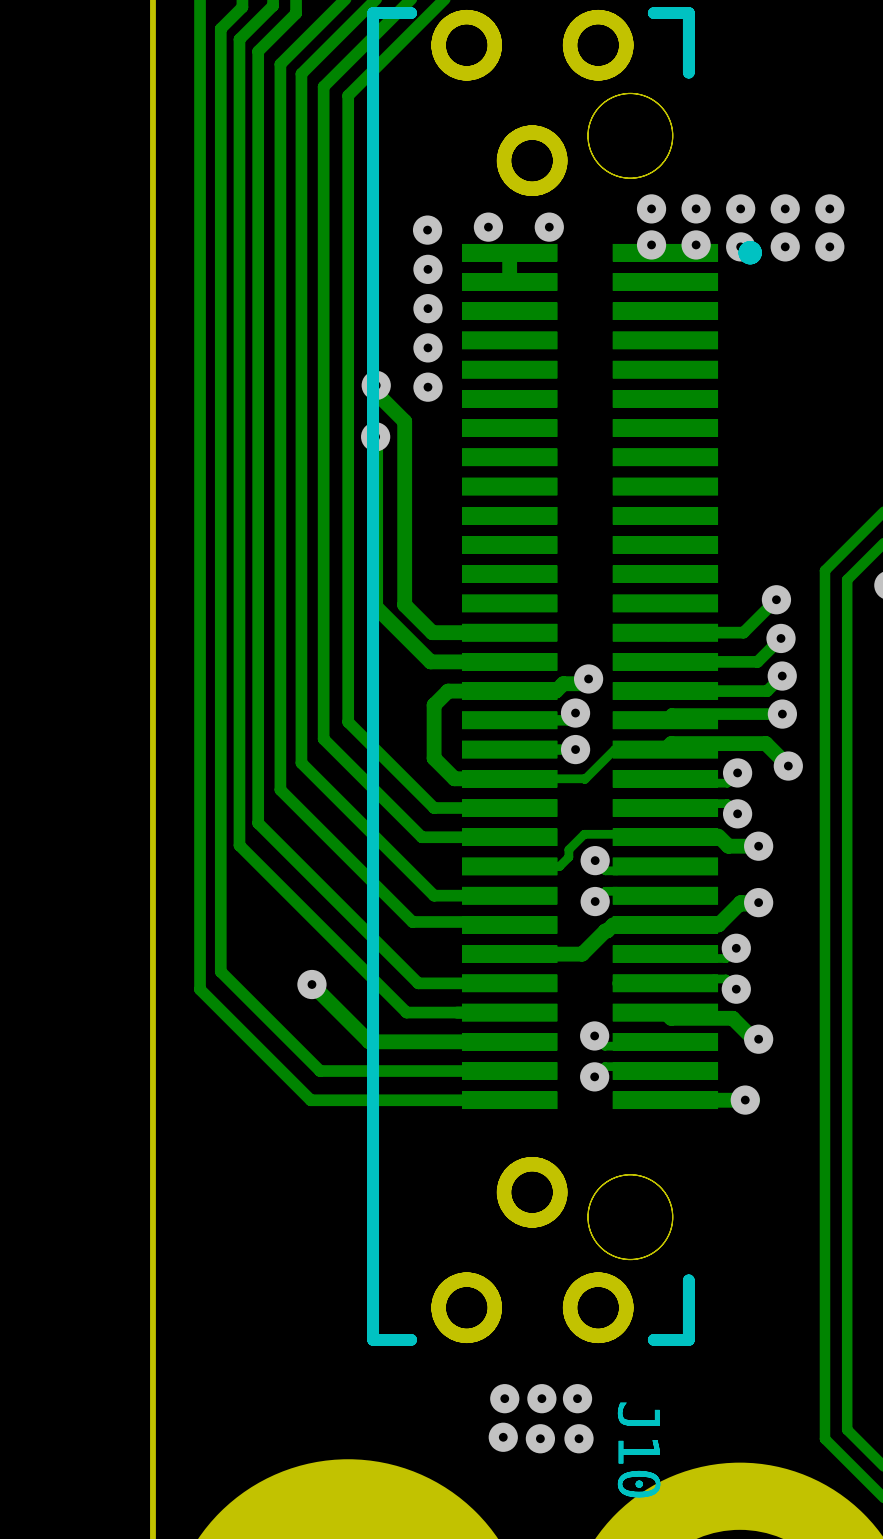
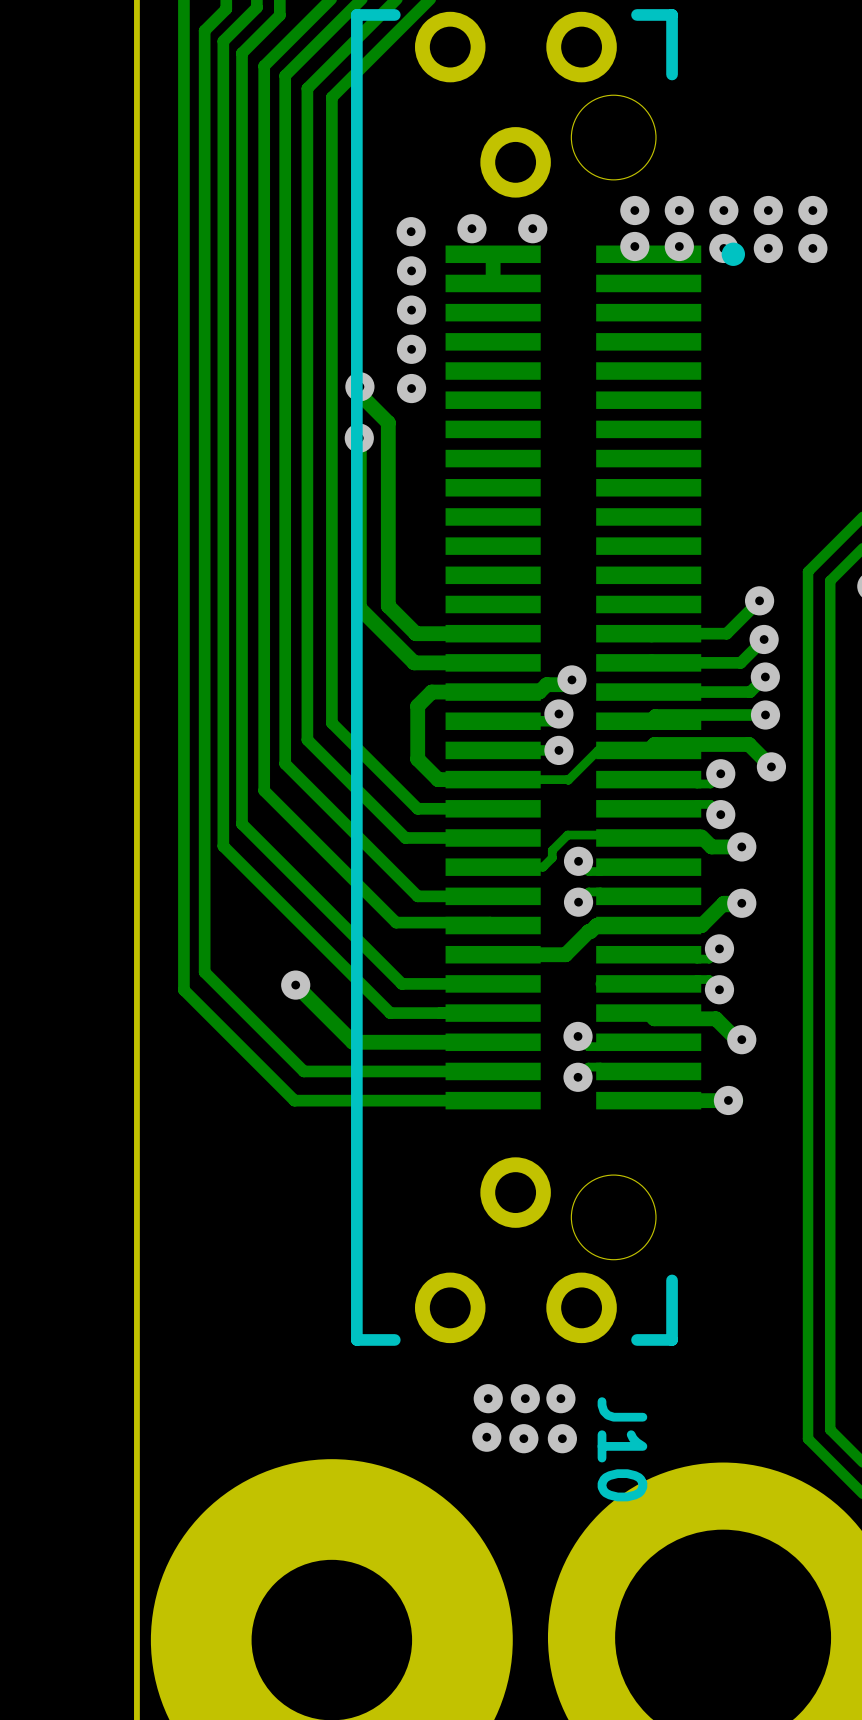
J10: (564, 676) -> none

